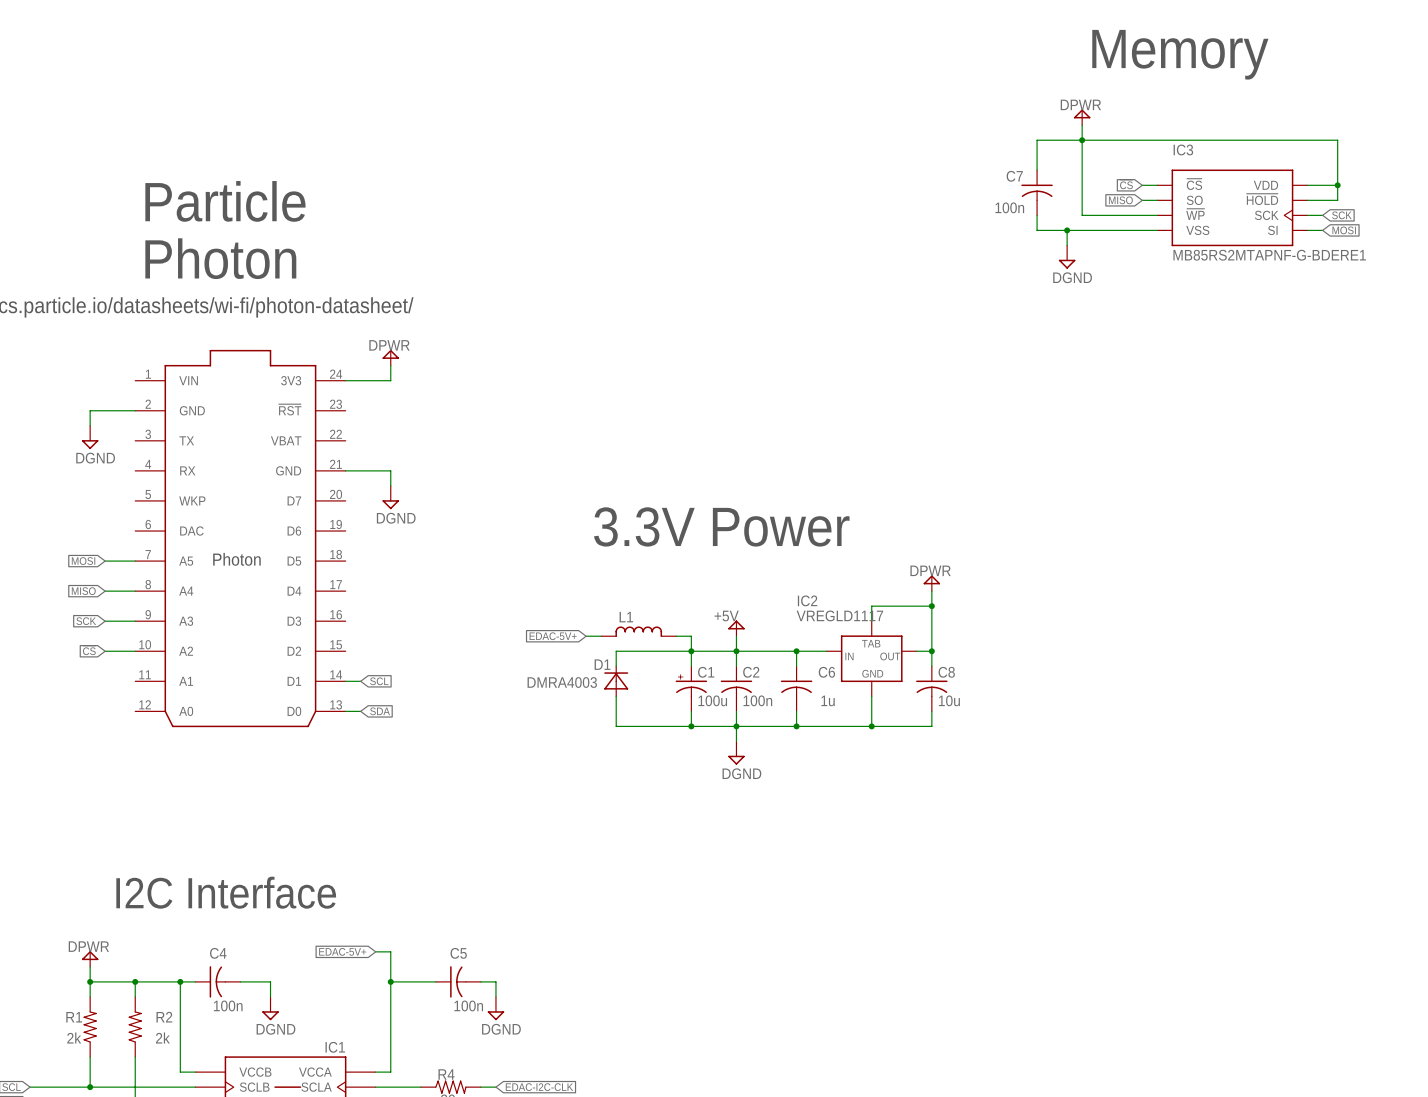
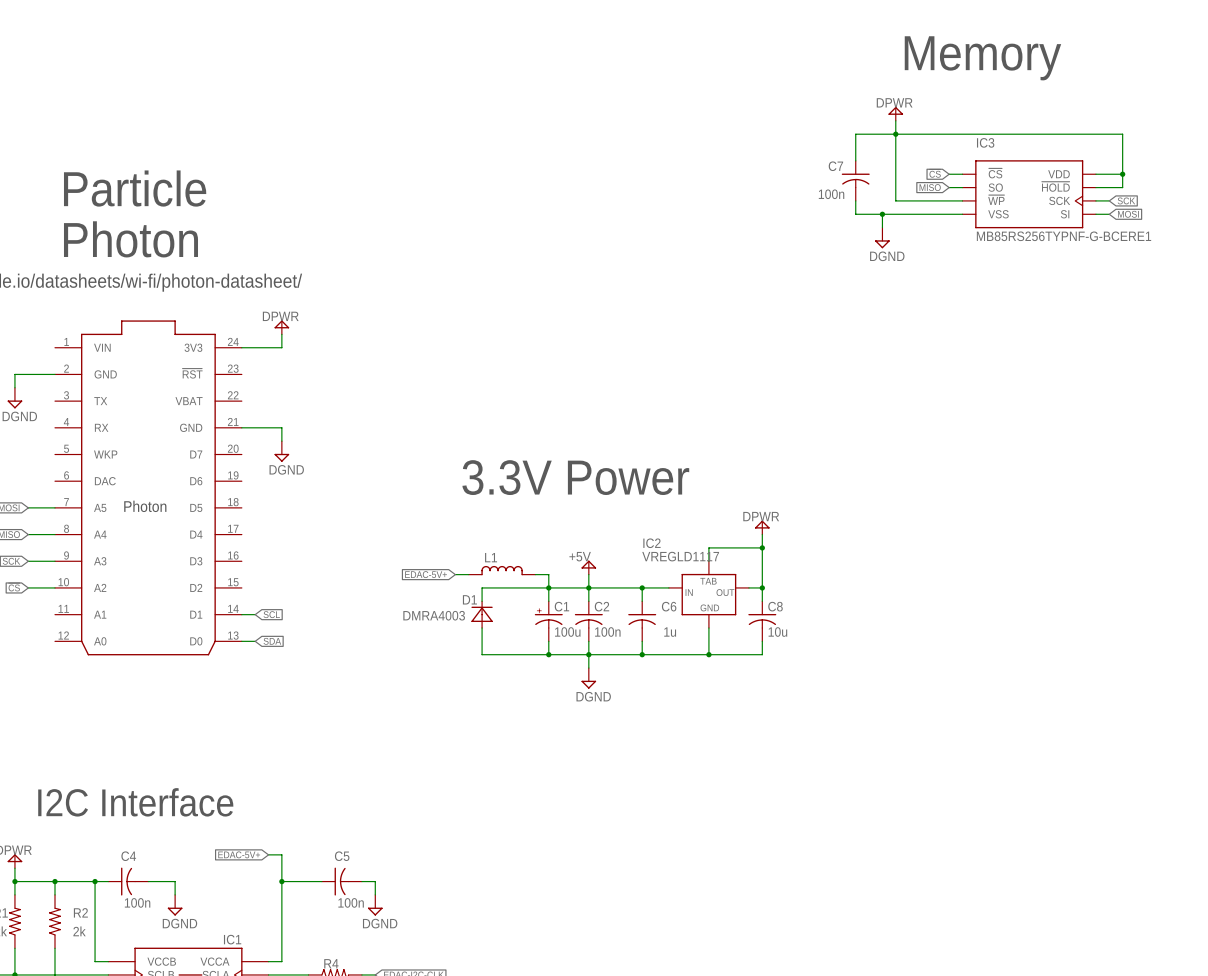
IC3 value: MB85RS2MTAPNF-G-BDERE1 (1269, 255) -> MB85RS256TYPNF-G-BCERE1 (1064, 236)

